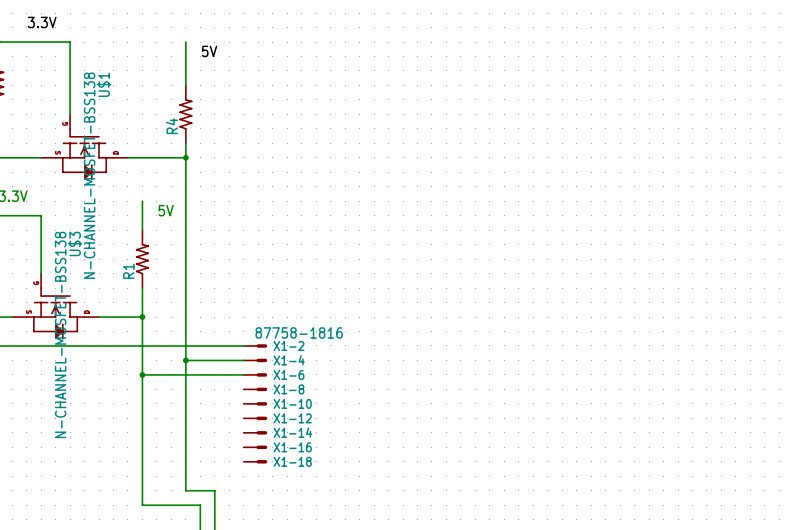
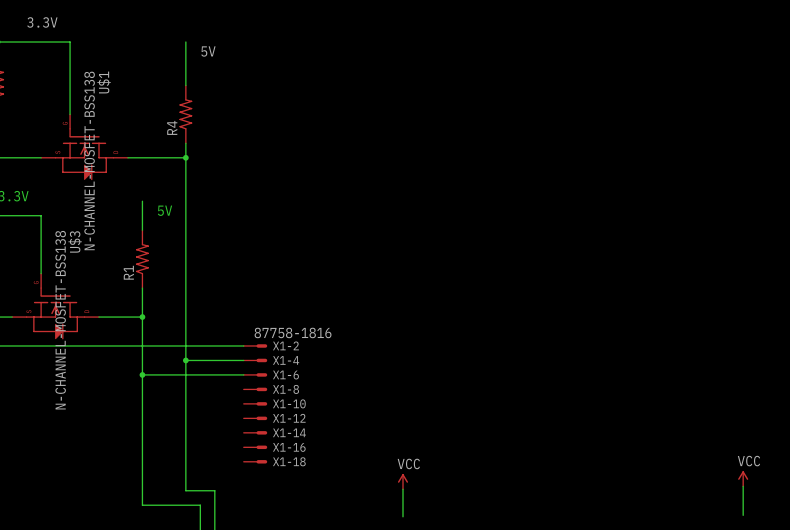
power symbol: none -> VCC (743, 478)
power symbol: none -> VCC (403, 481)
wire: none -> (743, 486) (743, 515)
wire: none -> (403, 489) (403, 516)

